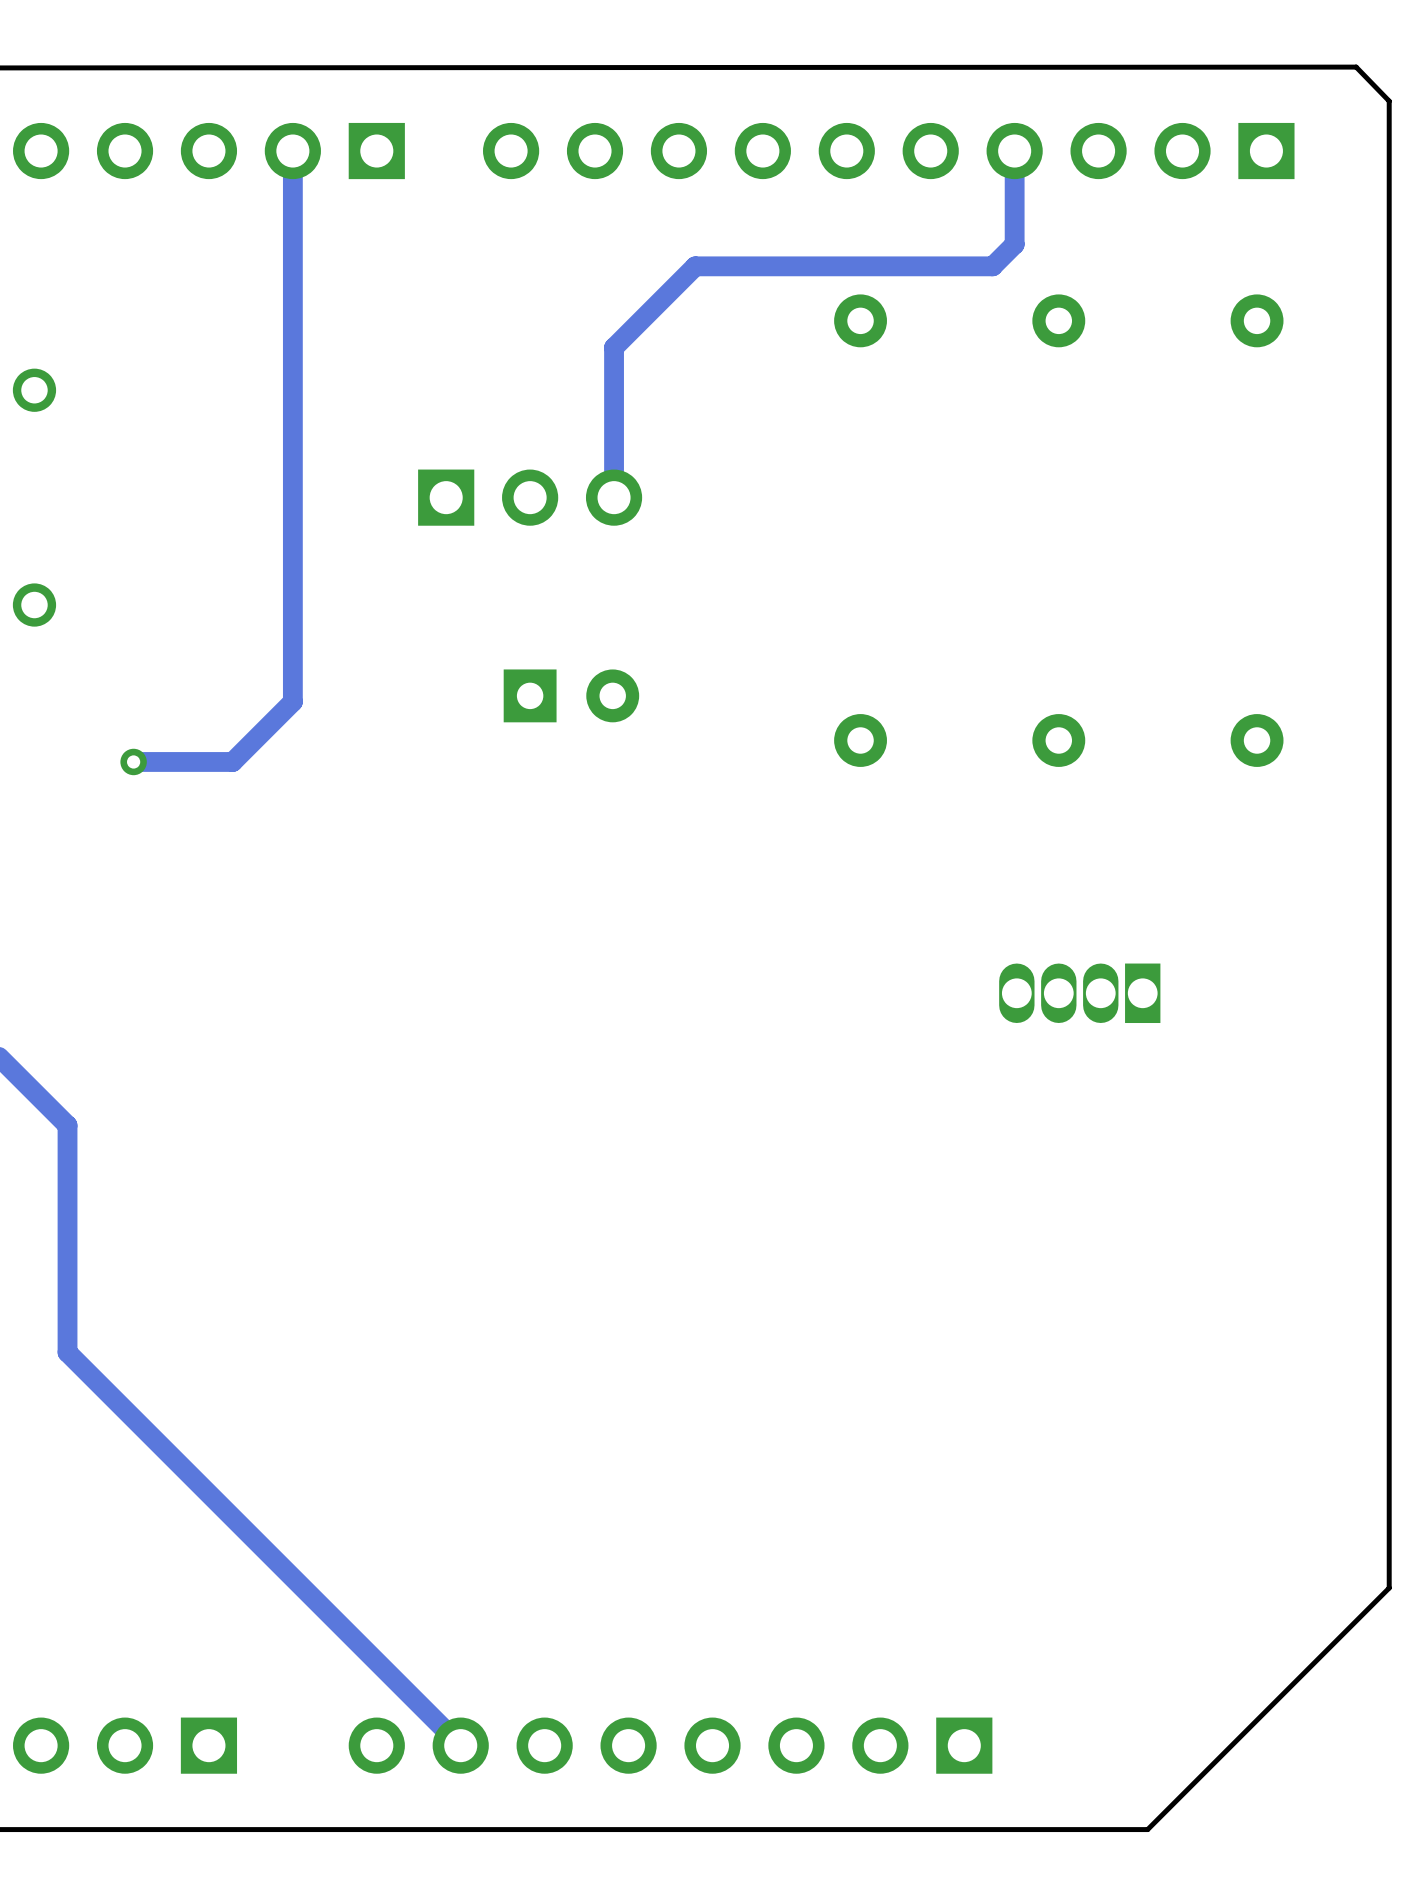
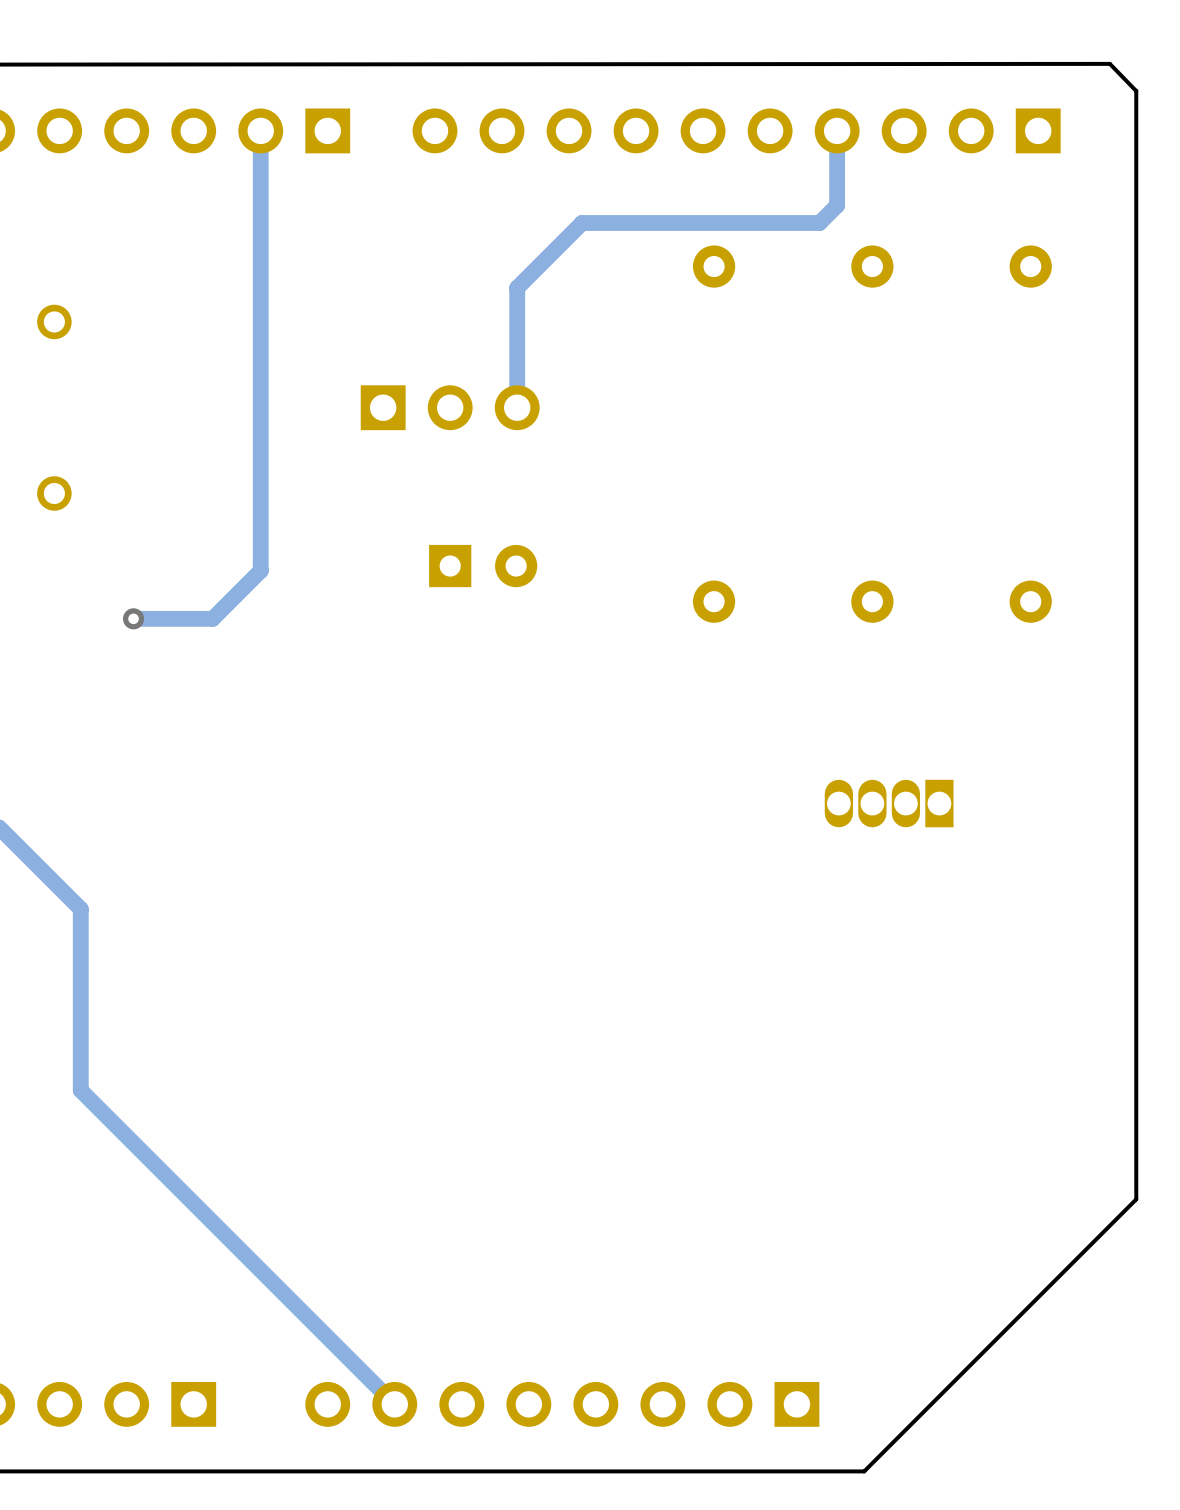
board edge: (1389, 1488) (1389, 1588) (1147, 1829) (1048, 1829) -> (1136, 1199) (864, 1471)

